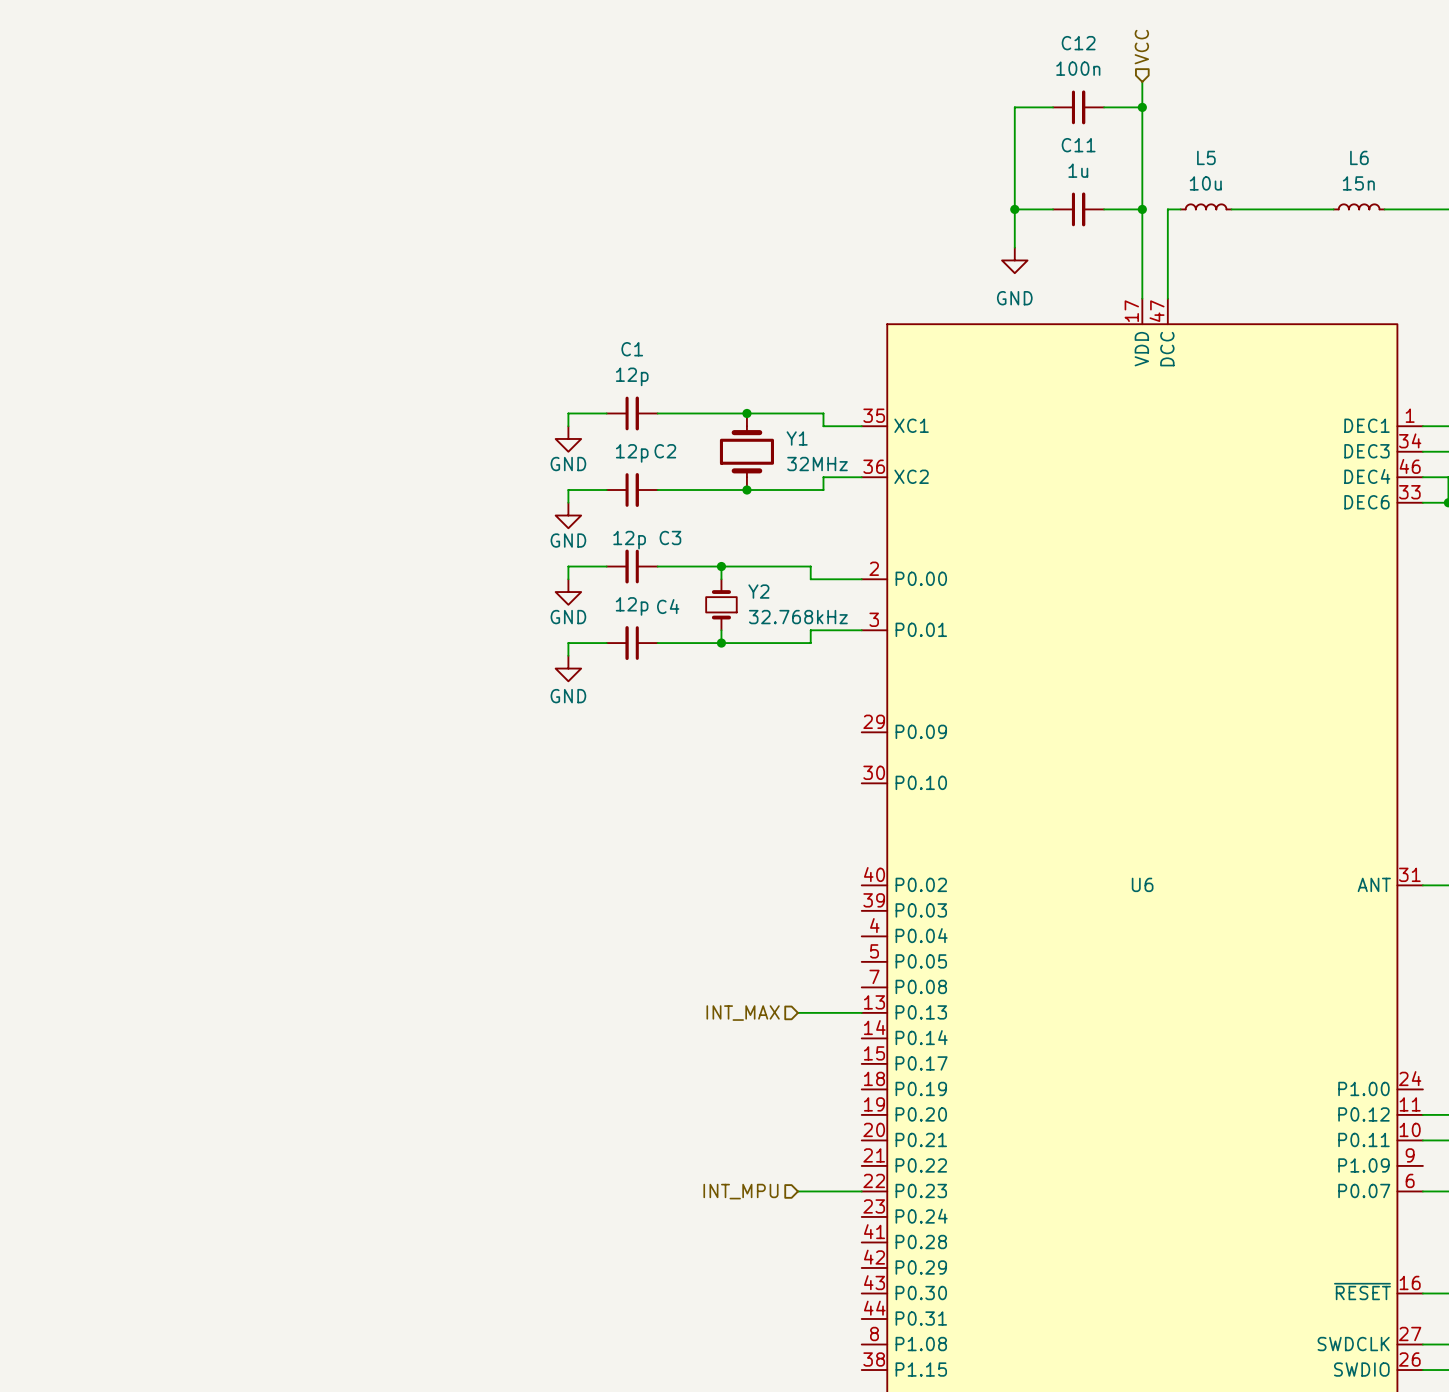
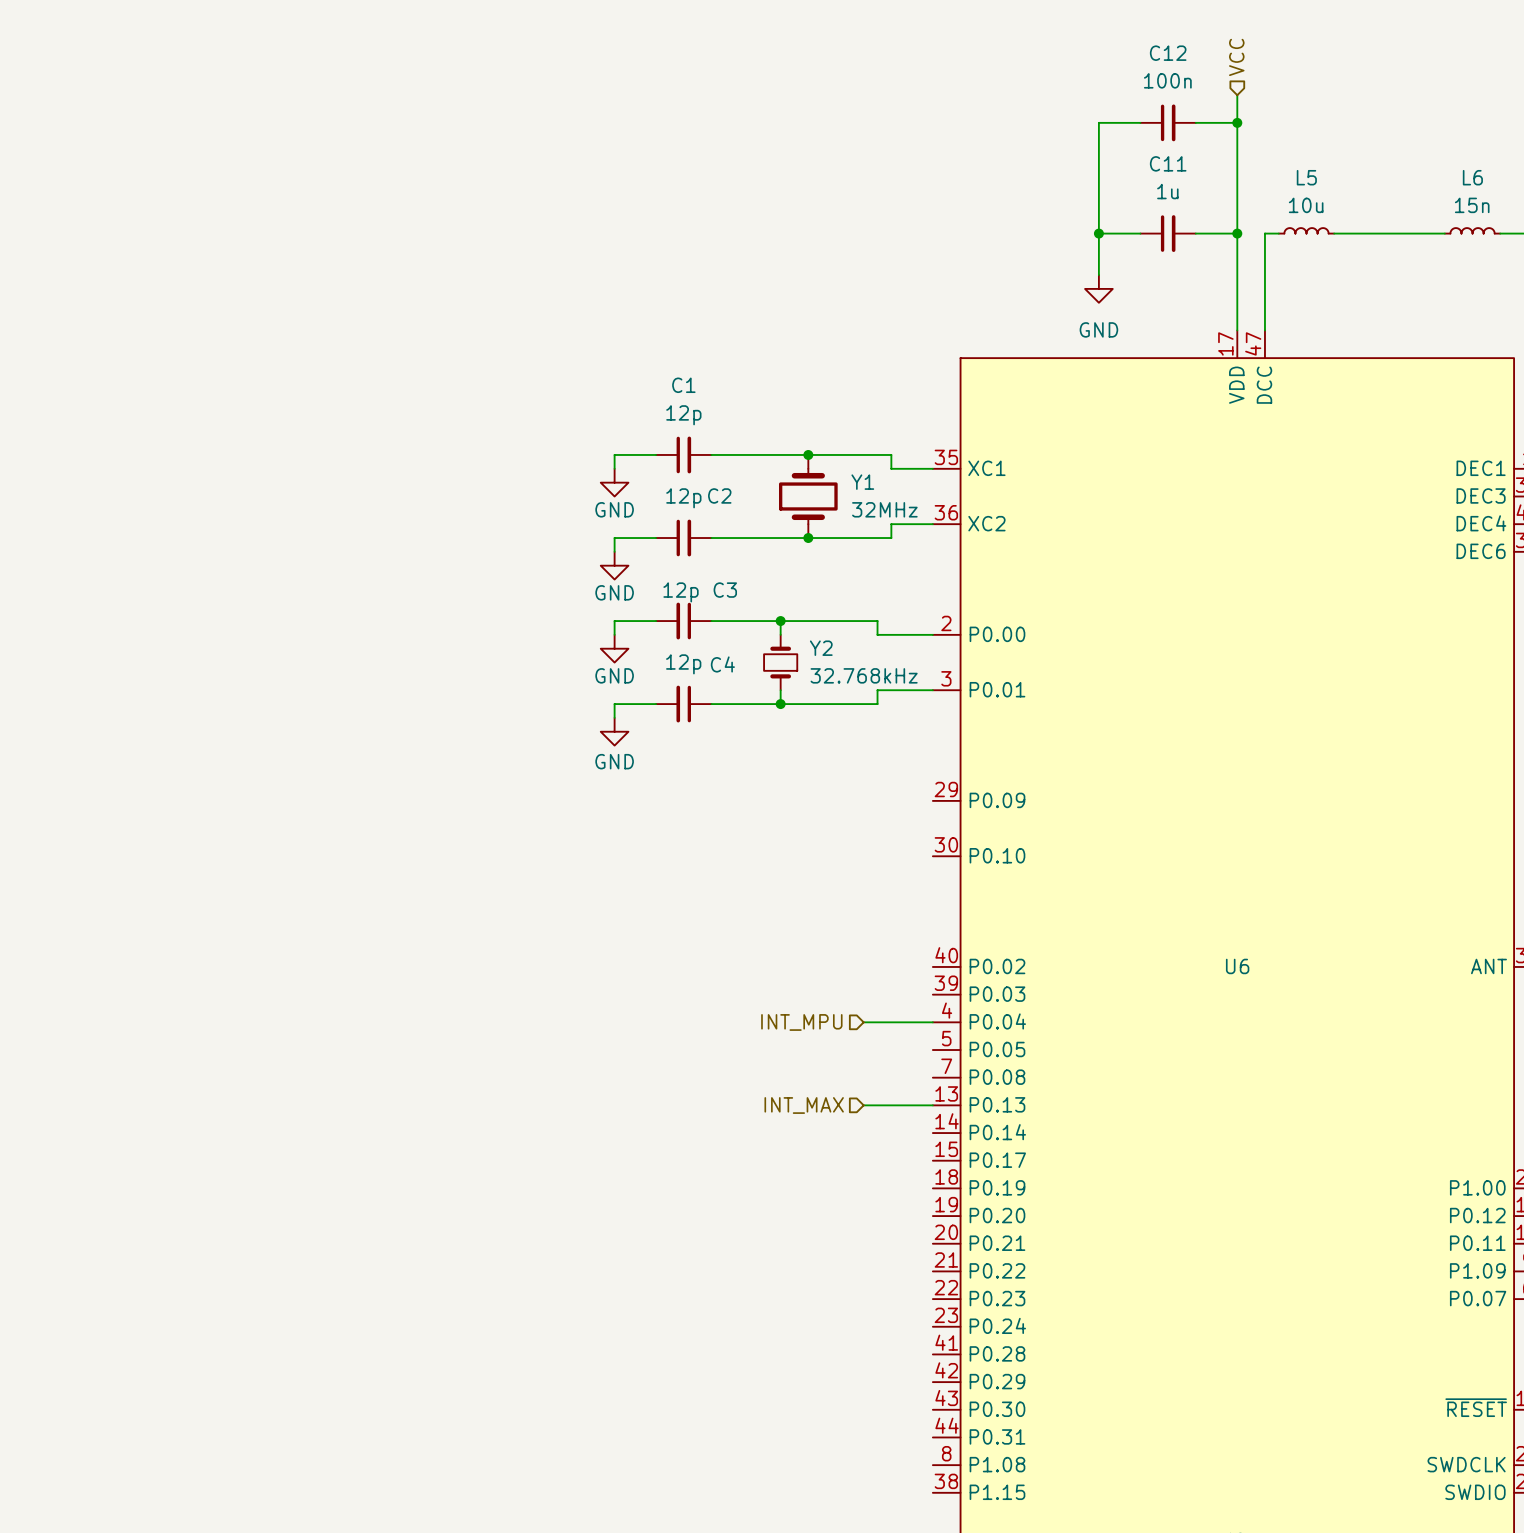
hierarchical label: none -> INT_MPU (801, 1022)
wire: none -> (863, 1022) (932, 1022)
hierarchical label: INT_MPU (740, 1191) -> none
wire: (797, 1191) (861, 1191) -> none

